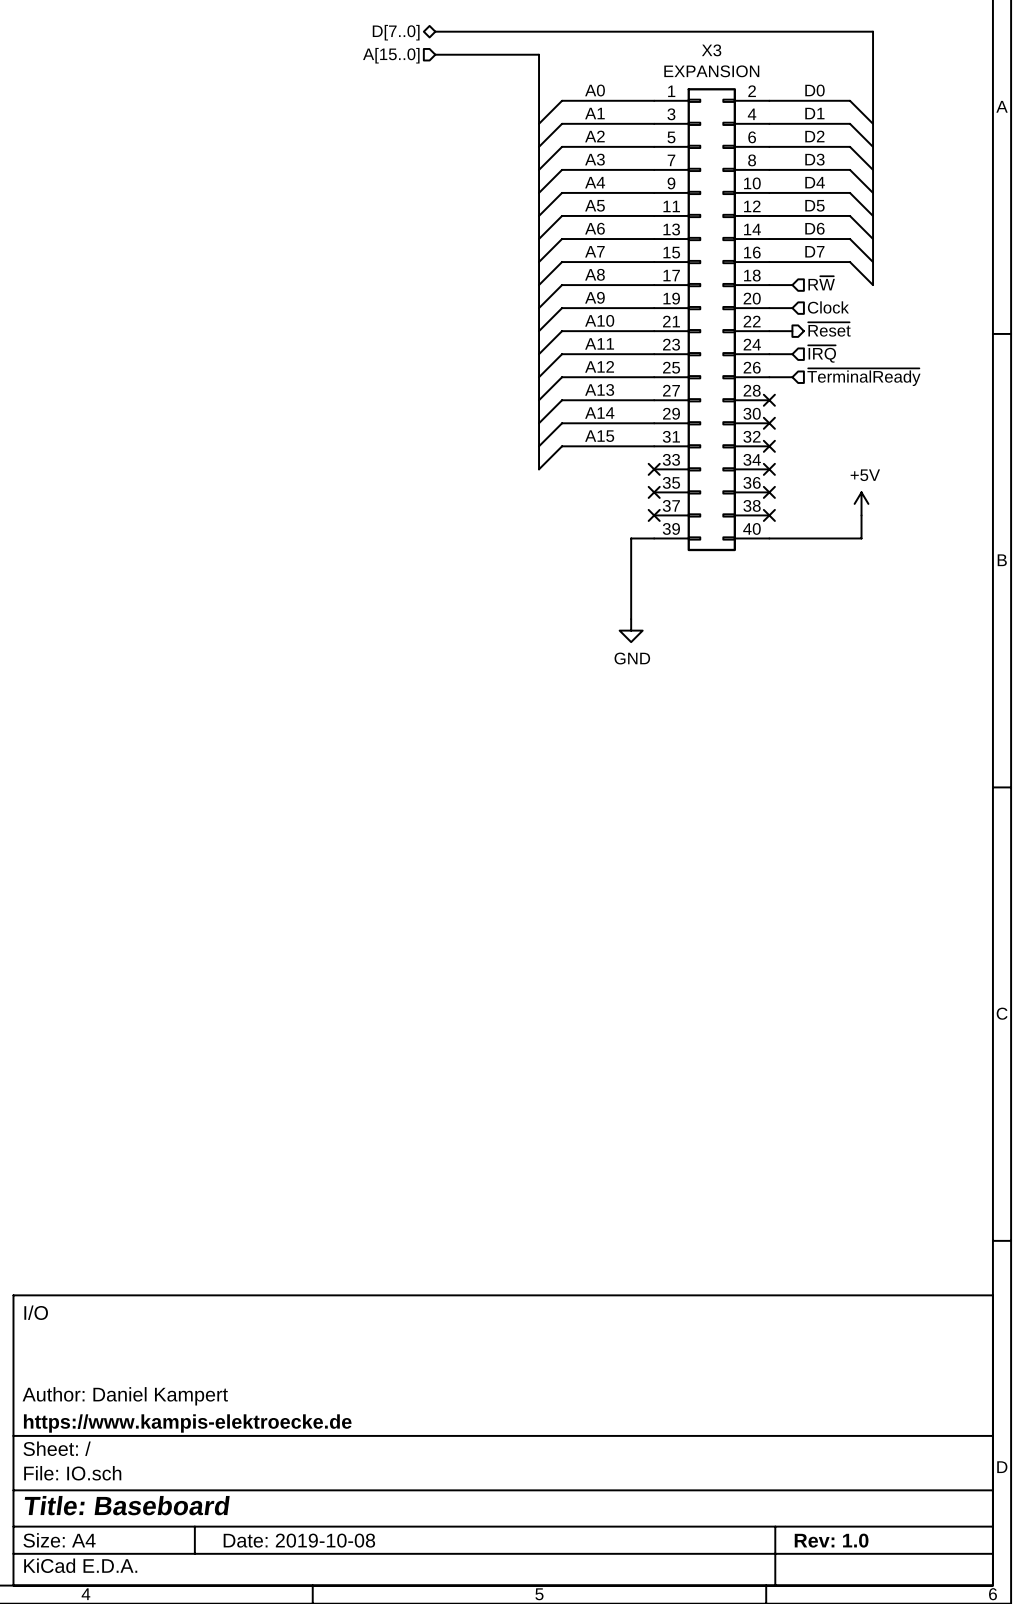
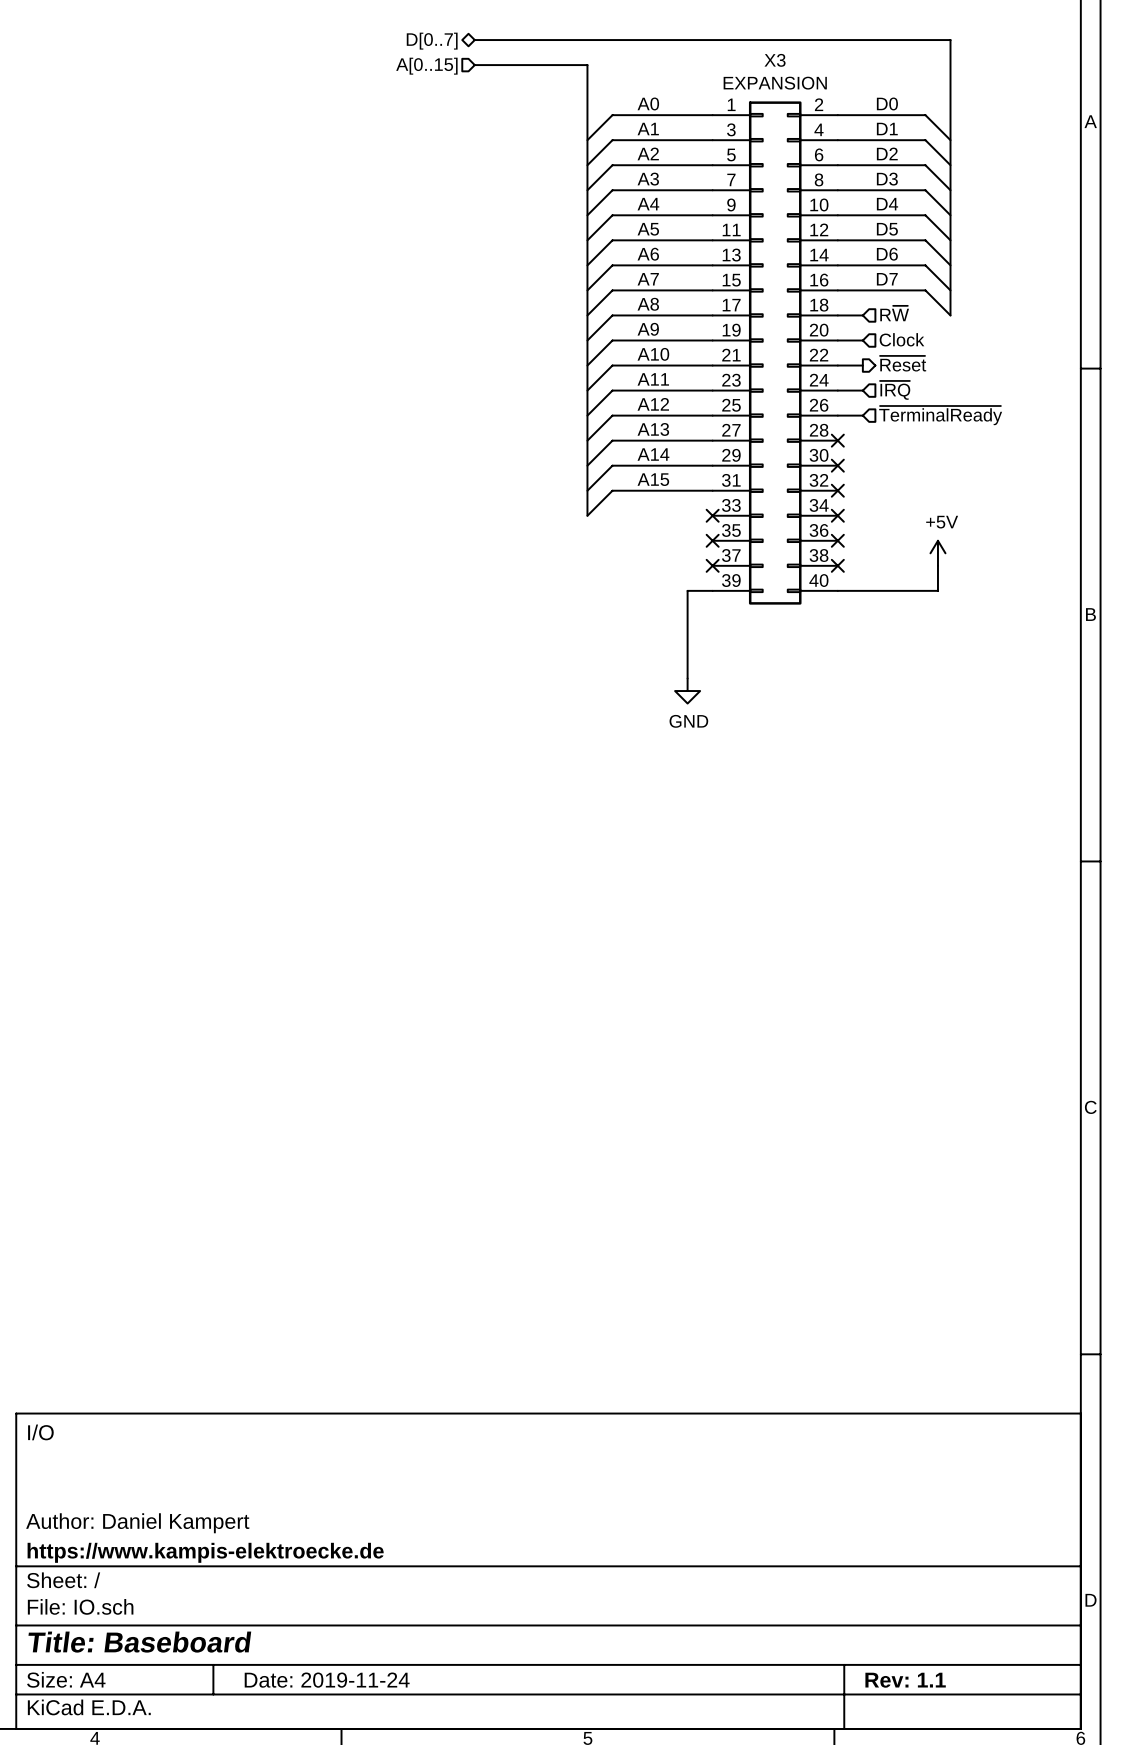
hierarchical label: D[7..0] (396, 32) -> D[0..7] (432, 41)
hierarchical label: A[15..0] (391, 55) -> A[0..15] (426, 66)
title block: Date: 2019-10-08 (299, 1540) -> Date: 2019-11-24 (327, 1680)
title block: Rev: 1.0 (831, 1540) -> Rev: 1.1 (905, 1680)

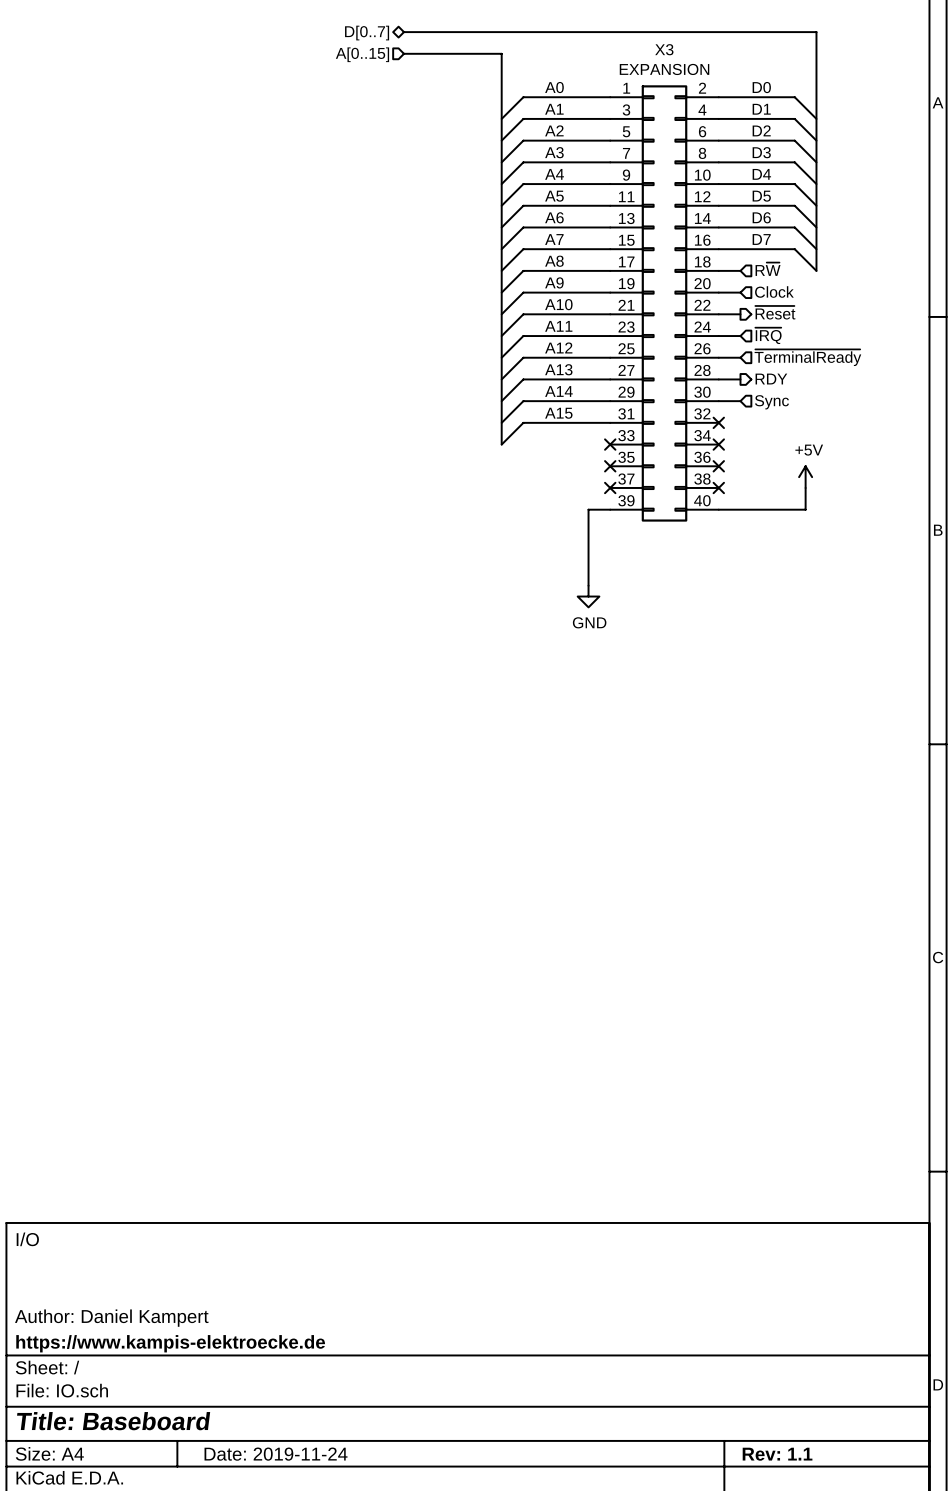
wire: none -> (718, 379) (740, 379)
no-connect mark: (837, 440) -> none
hierarchical label: none -> RDY (771, 379)
wire: none -> (718, 401) (740, 401)
no-connect mark: (837, 465) -> none
hierarchical label: none -> Sync (771, 402)

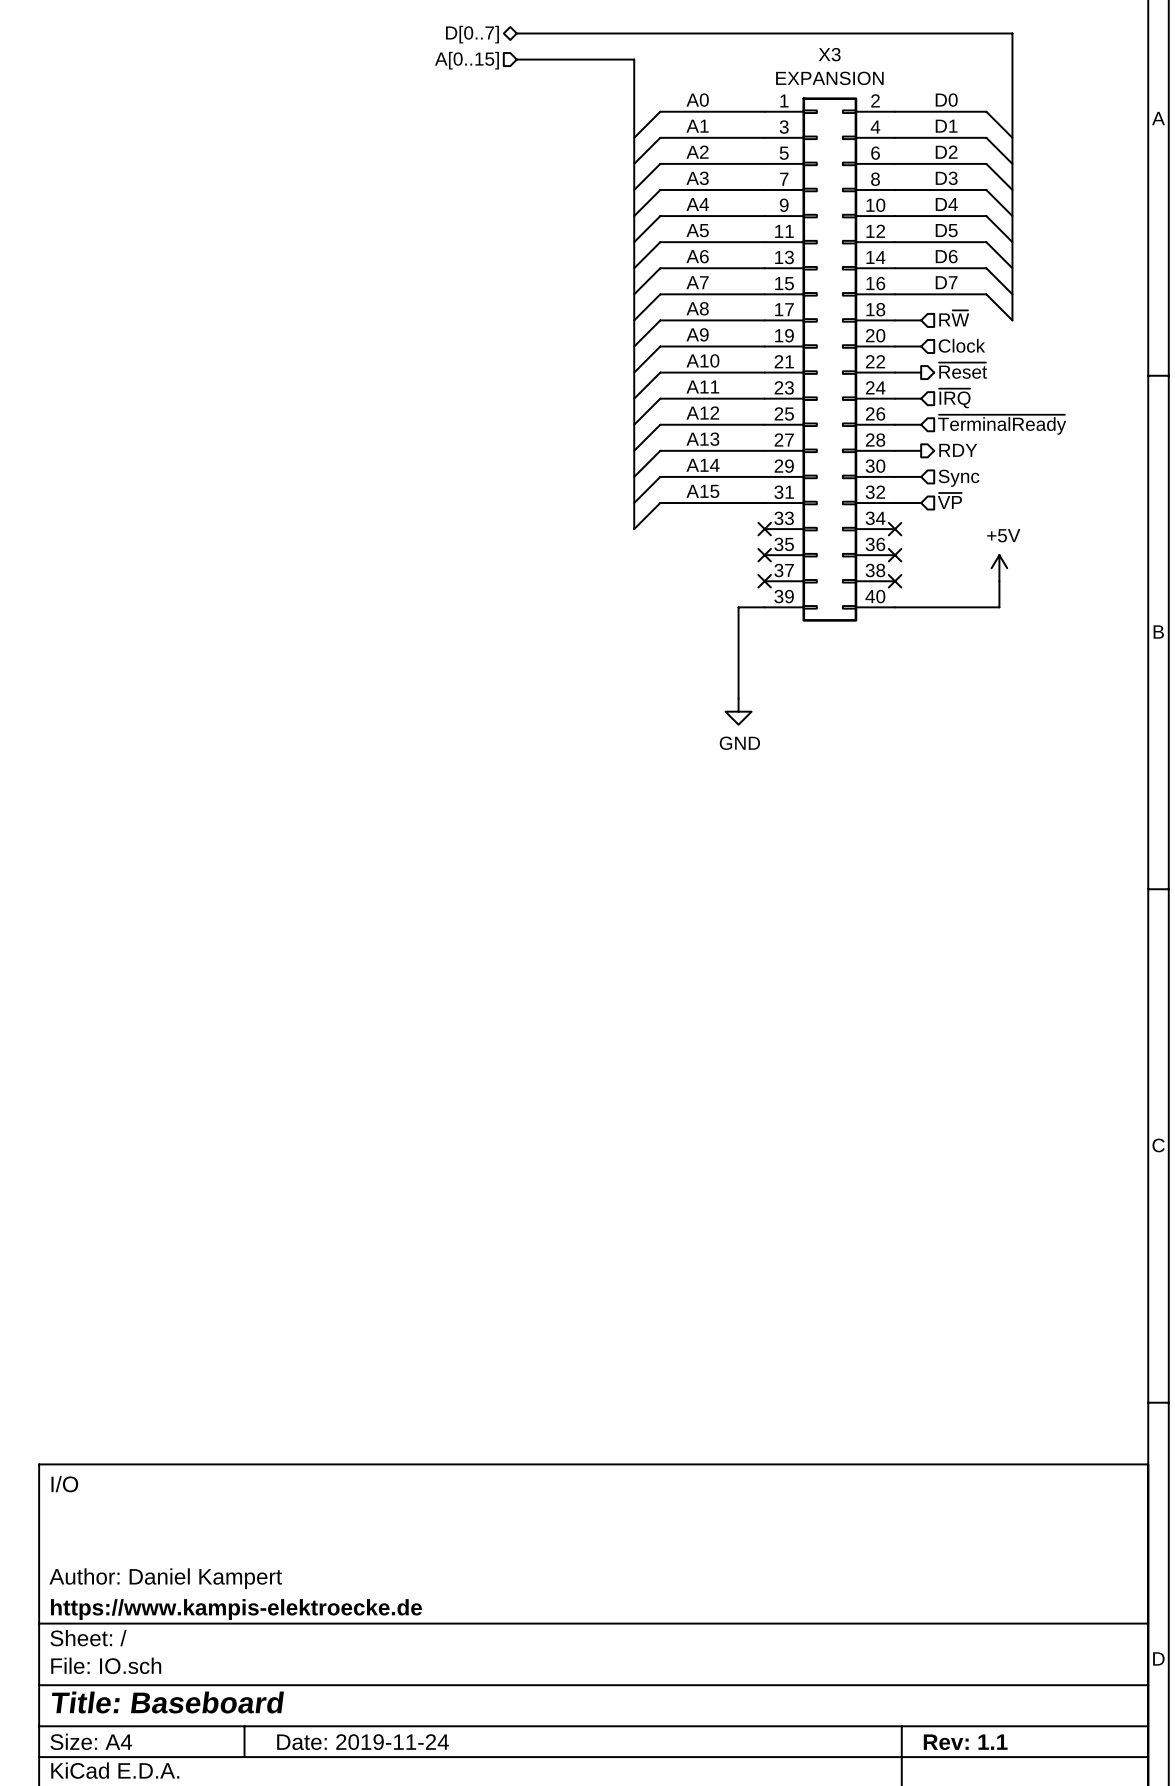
hierarchical label: none -> ~{VP} (949, 501)
wire: none -> (895, 503) (921, 503)
no-connect mark: (718, 422) -> none

